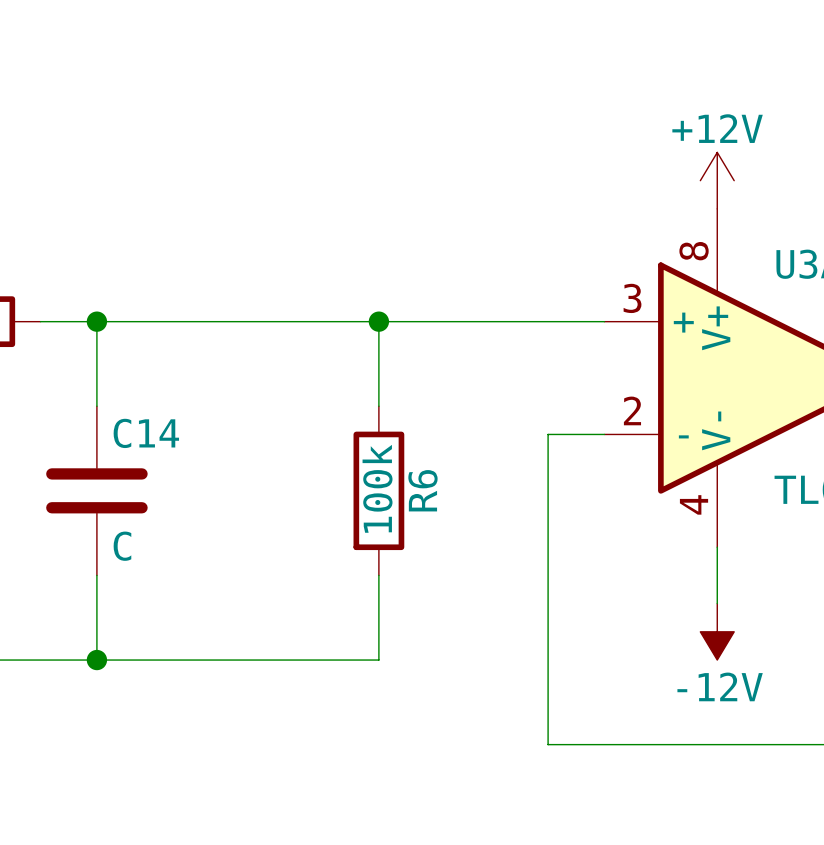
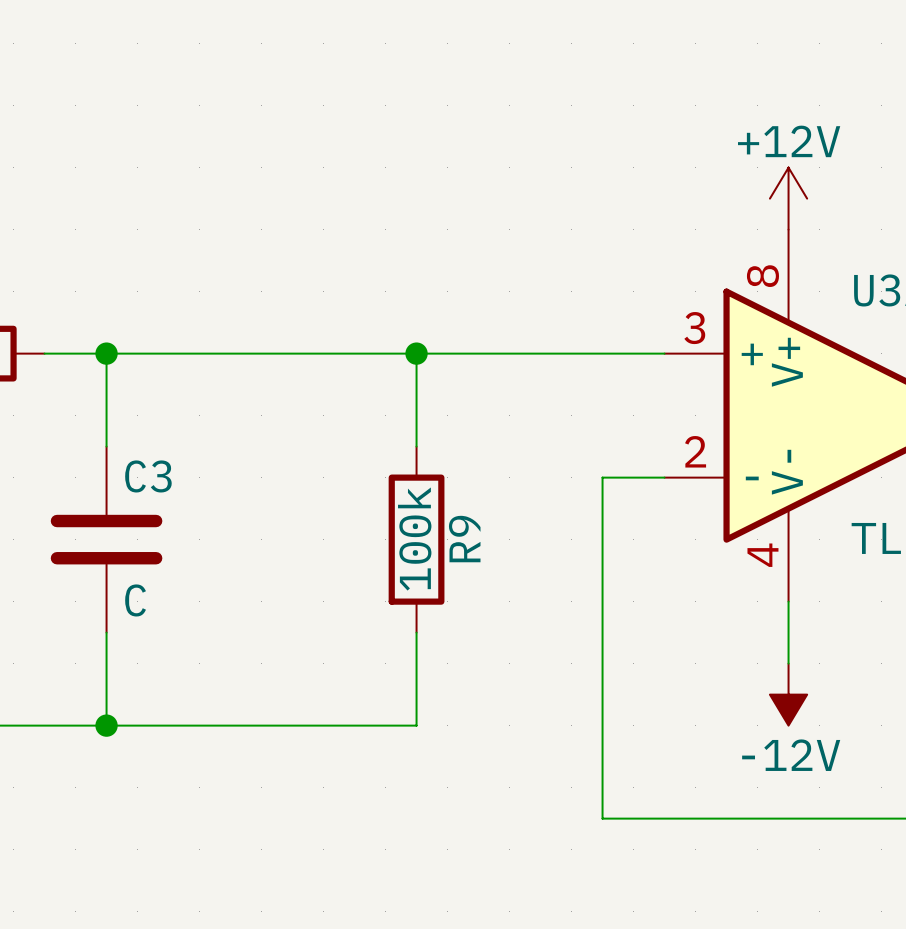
C14 name: C14 (146, 433) -> C3 (148, 476)
R6 name: R6 (422, 490) -> R9 (464, 539)

